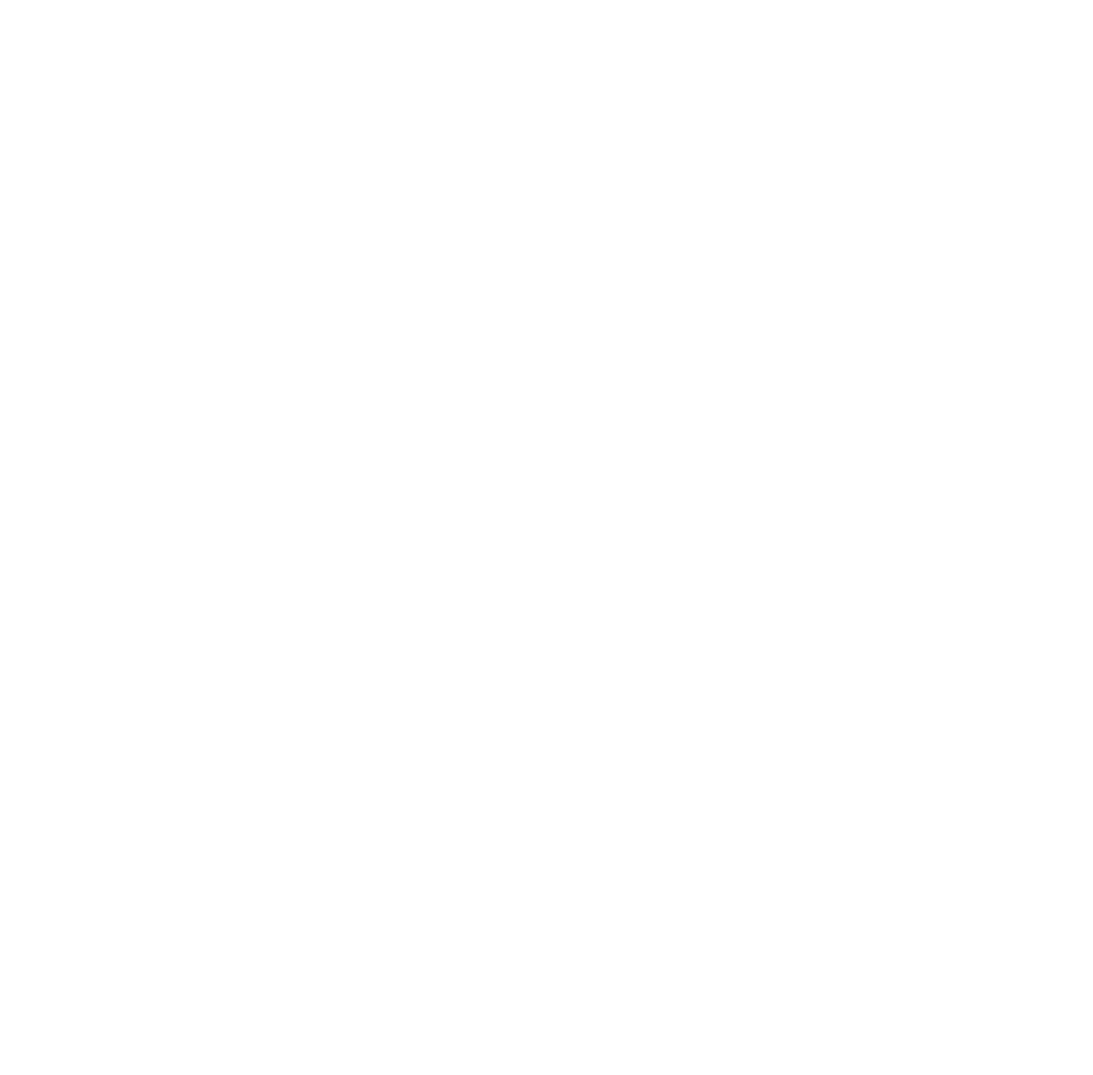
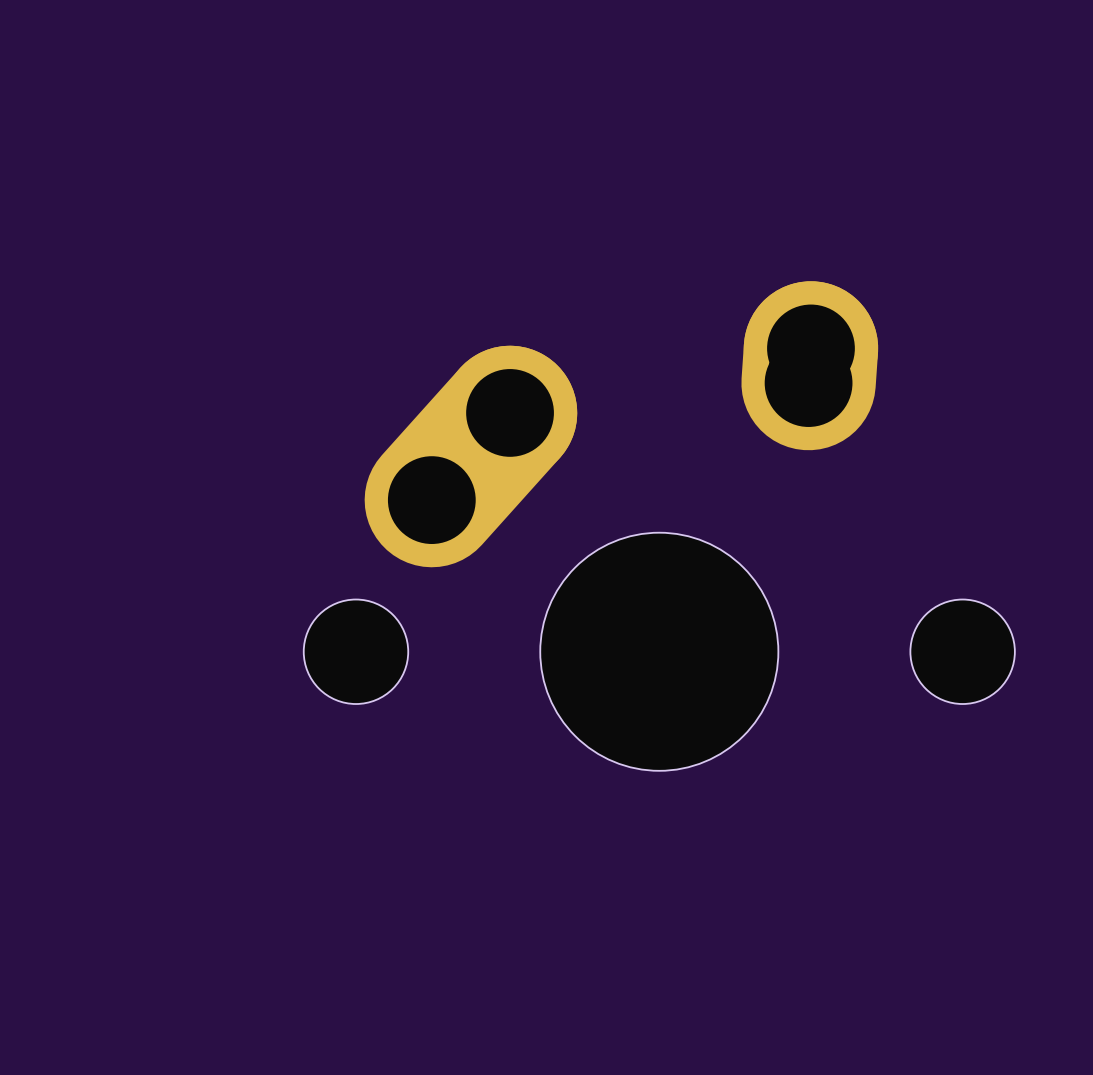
part: none -> (659, 526)

